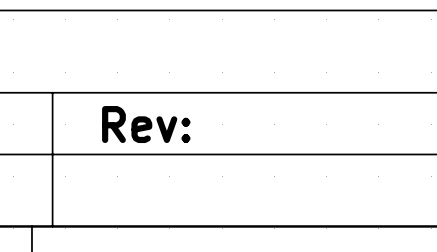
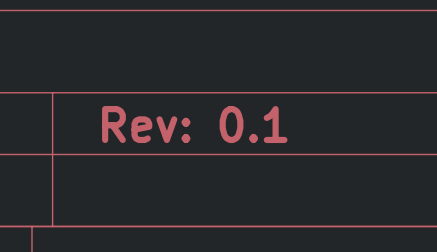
title block: Rev: (146, 124) -> Rev: 0.1 (194, 124)

